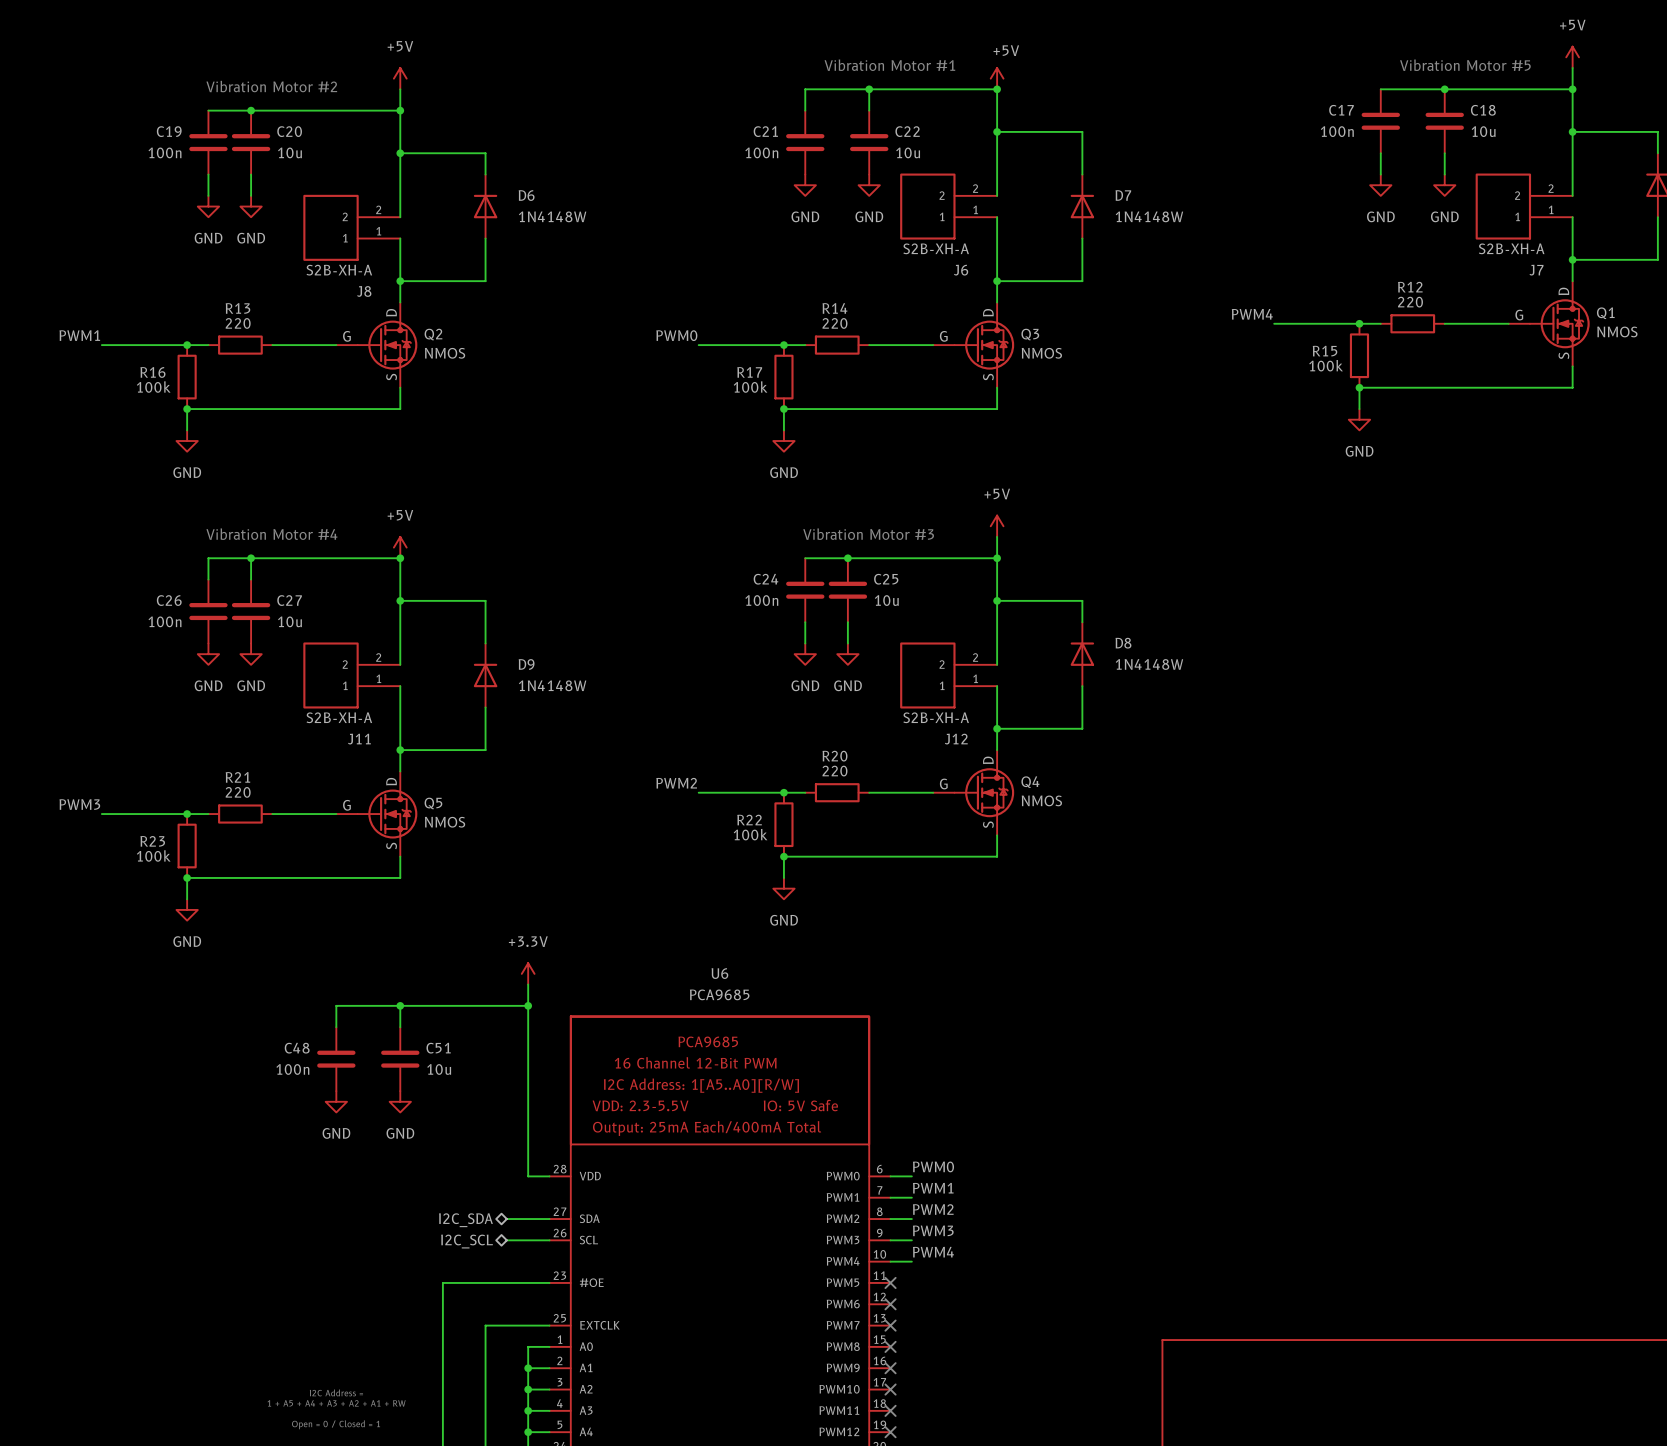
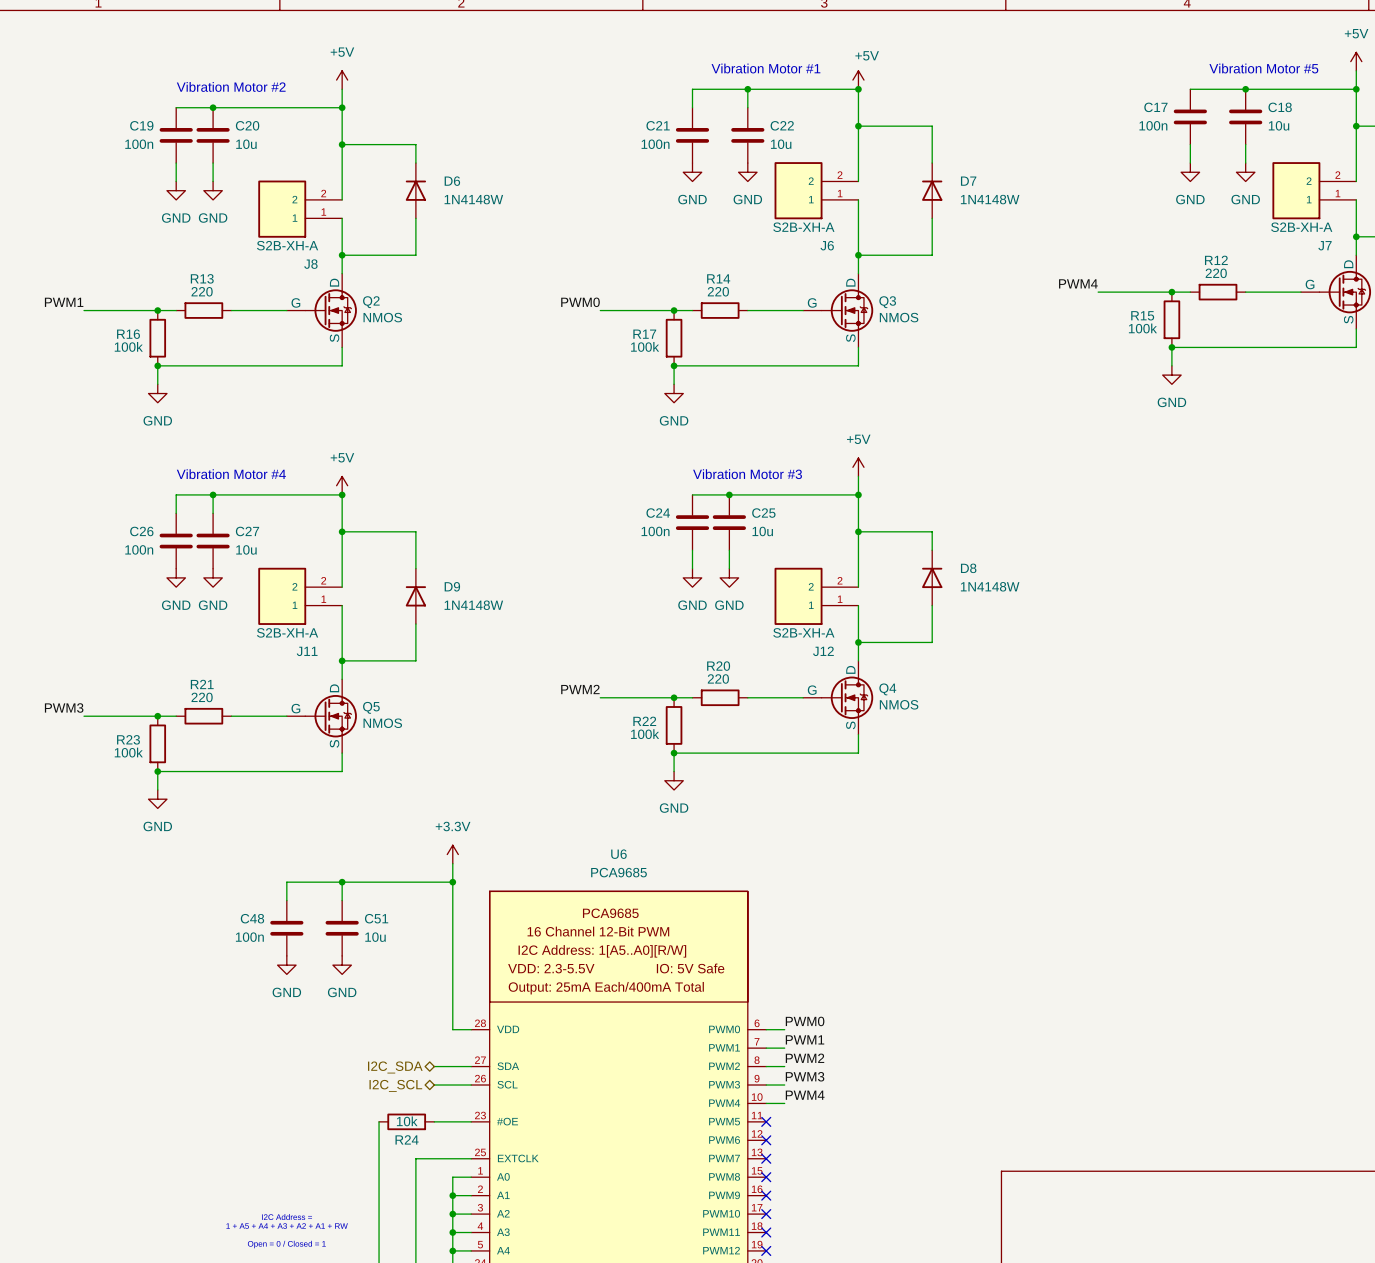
wire: (442, 1282) (506, 1282) -> none
R24: none -> 10k (406, 1121)

